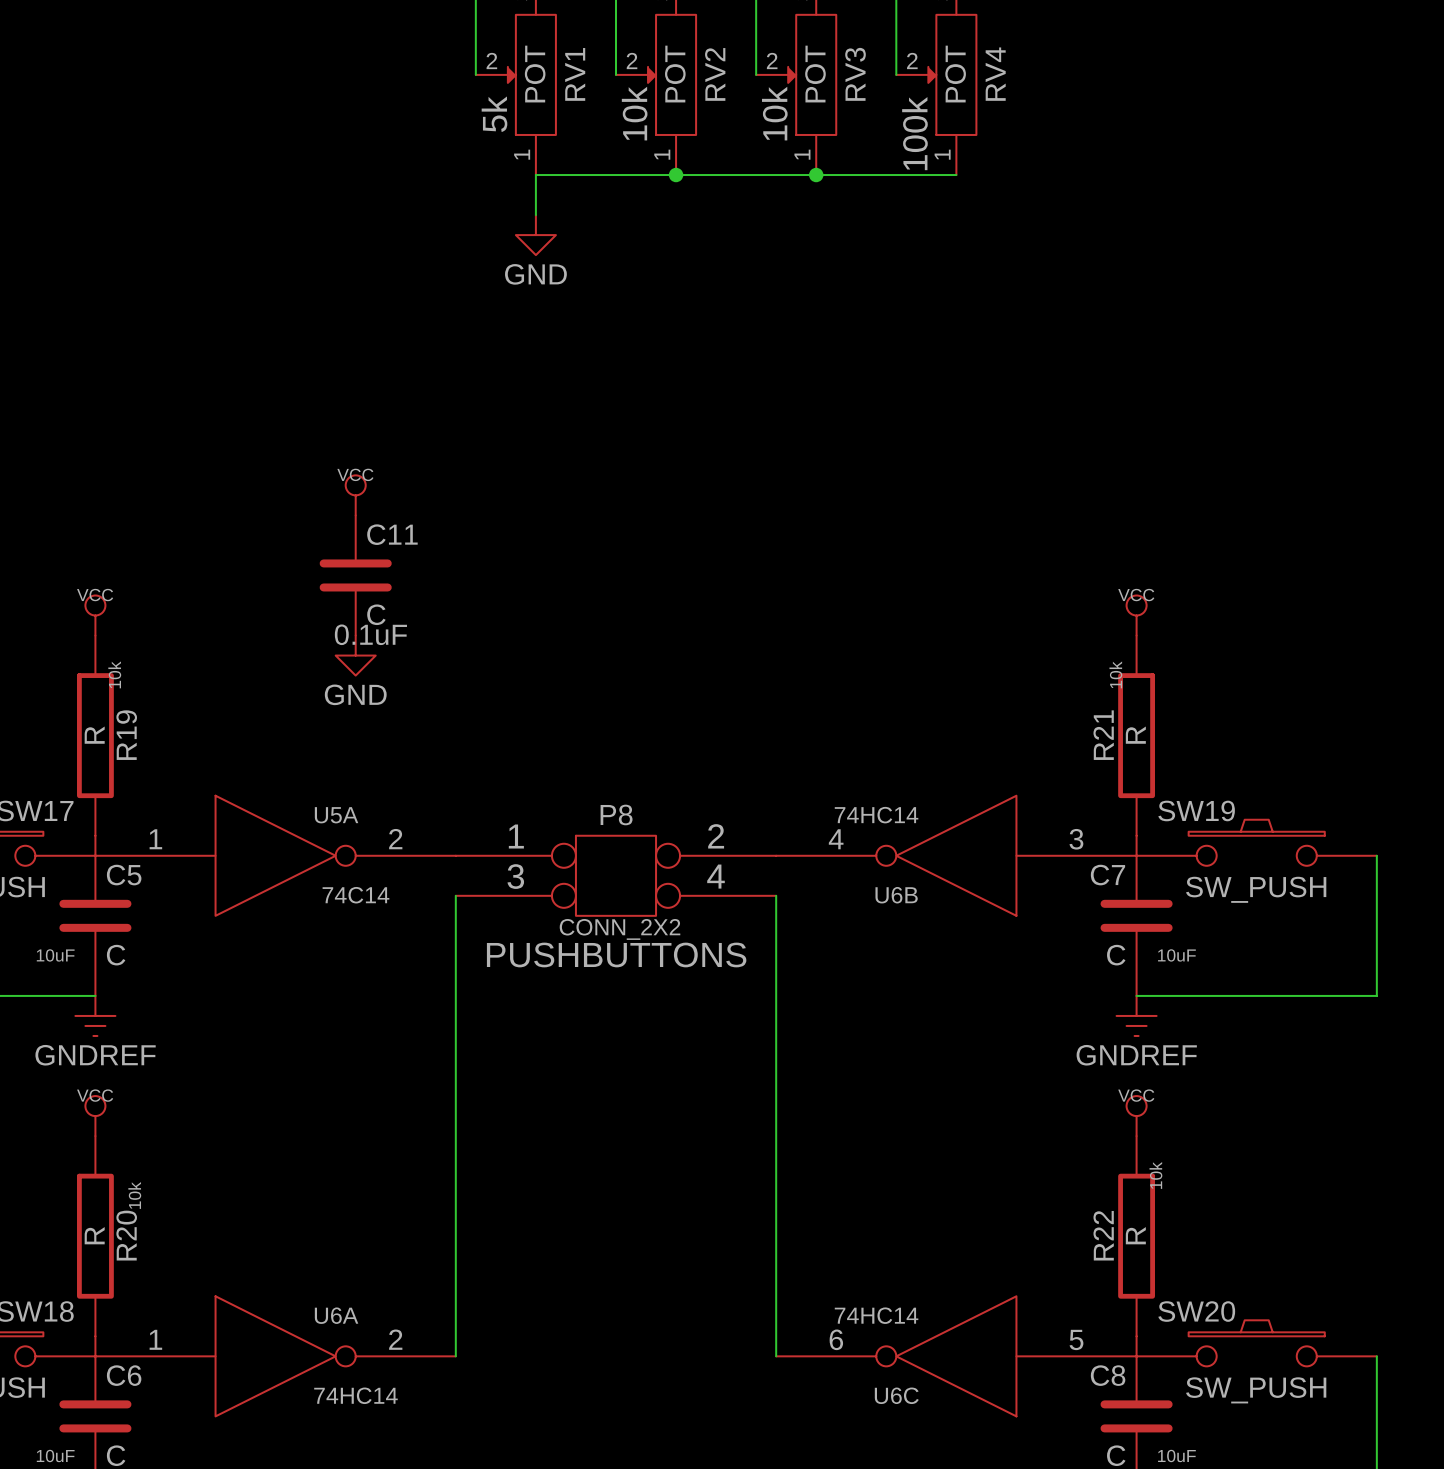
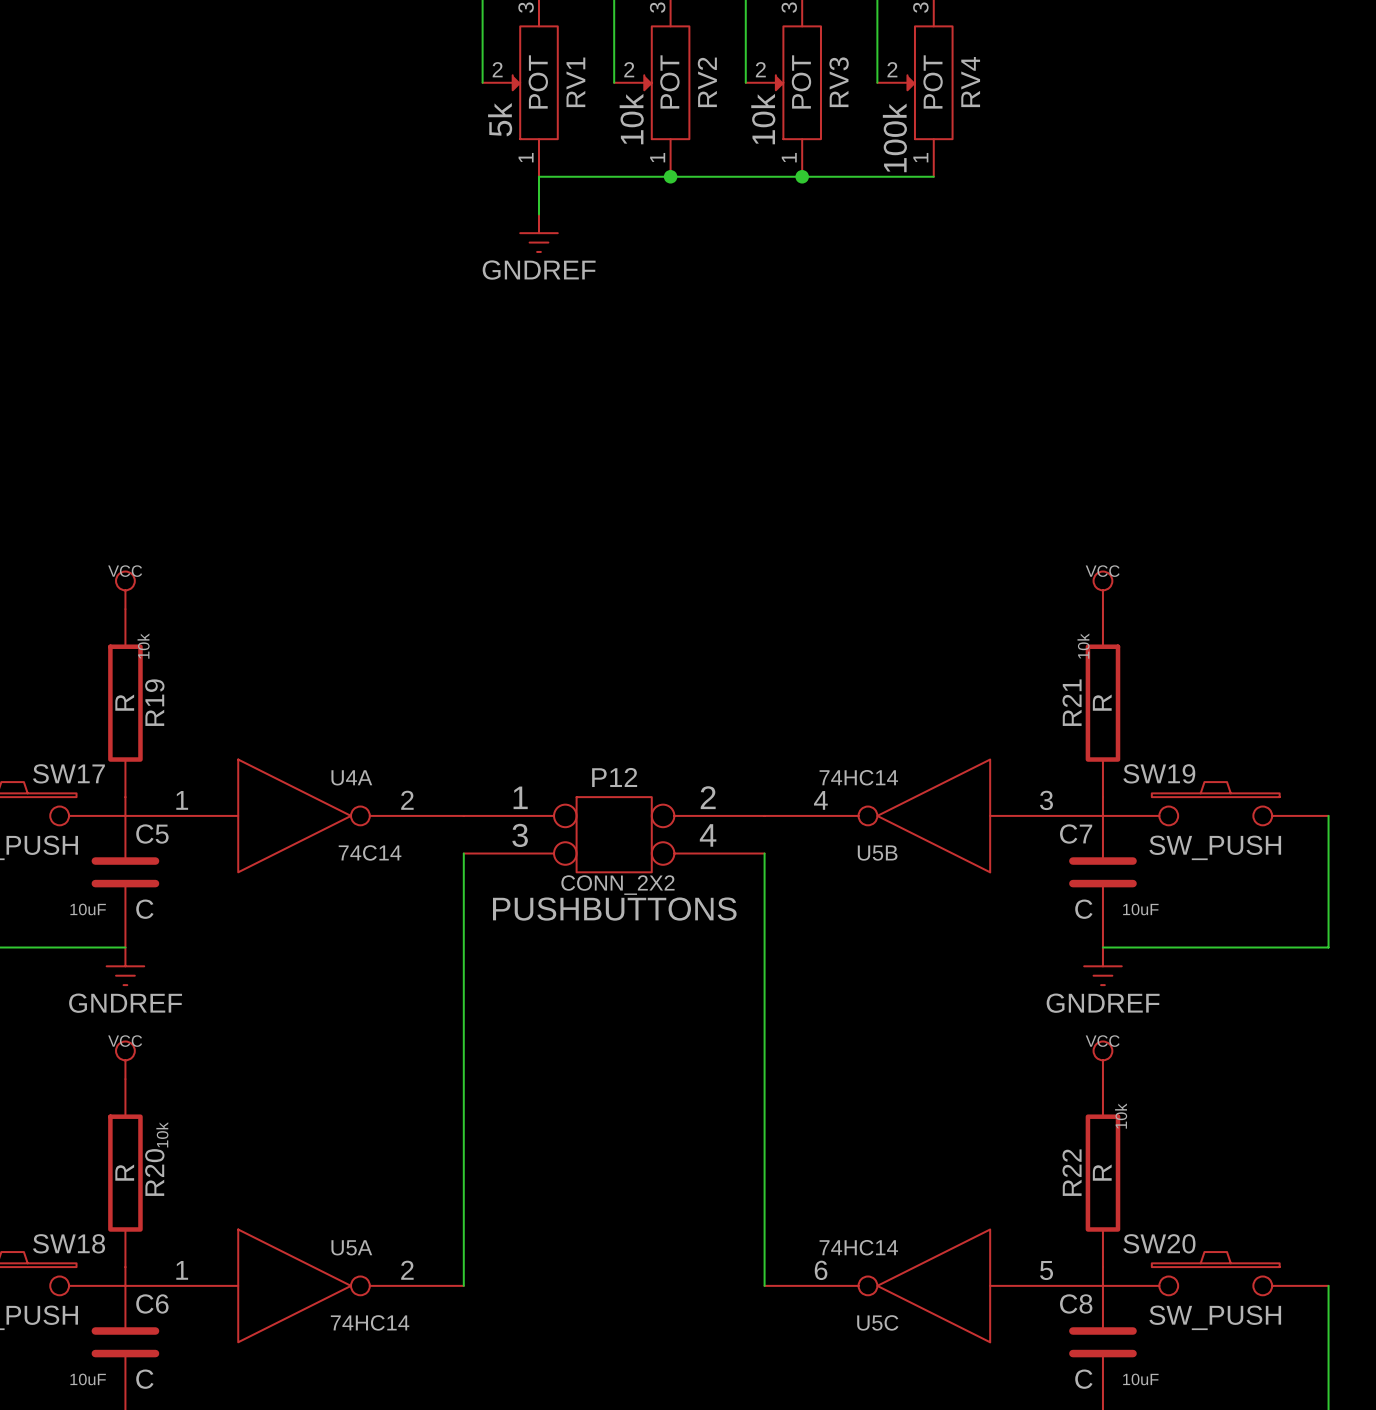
power symbol: GND (535, 235) -> GNDREF (539, 233)
power symbol: VCC (355, 495) -> none
C11: C (355, 575) -> none
power symbol: GND (355, 655) -> none
P8 name: P8 (616, 814) -> P12 (614, 777)
U5A name: U5A (336, 815) -> U4A (351, 777)
U6B name: U6B (896, 895) -> U5B (877, 853)
U6A name: U6A (336, 1315) -> U5A (351, 1247)
U6C name: U6C (896, 1395) -> U5C (877, 1322)

